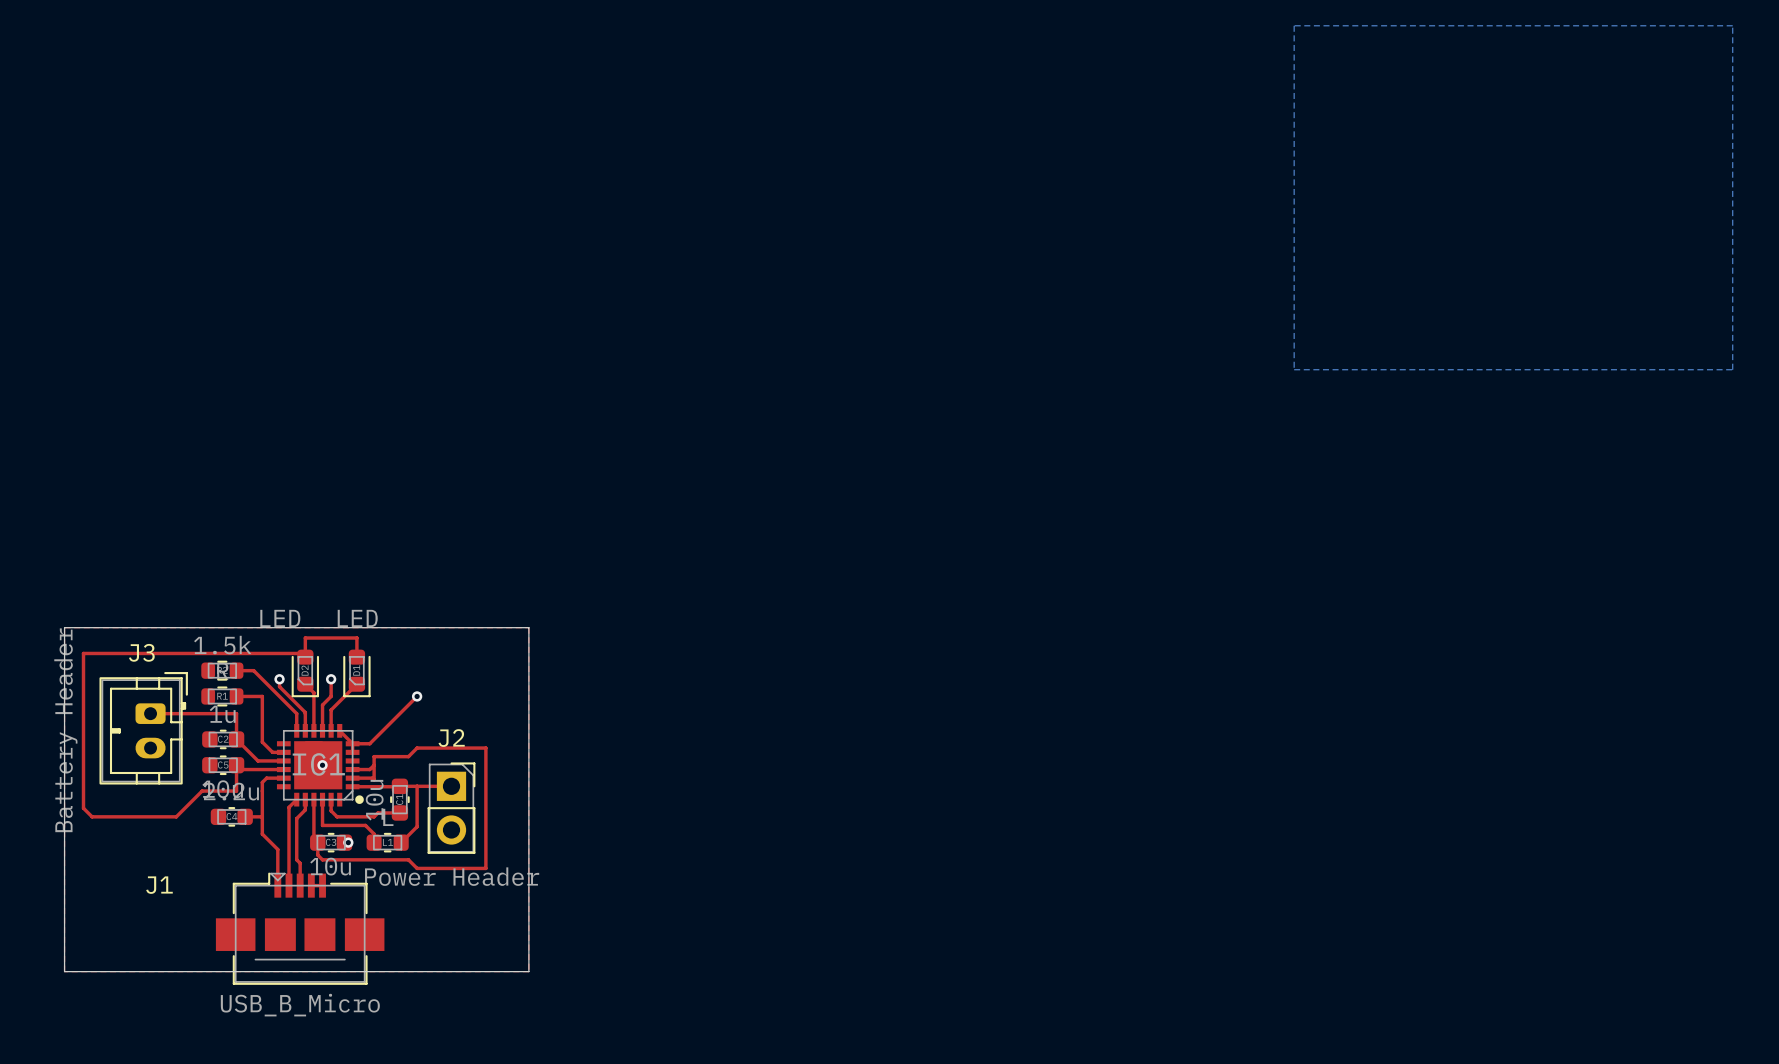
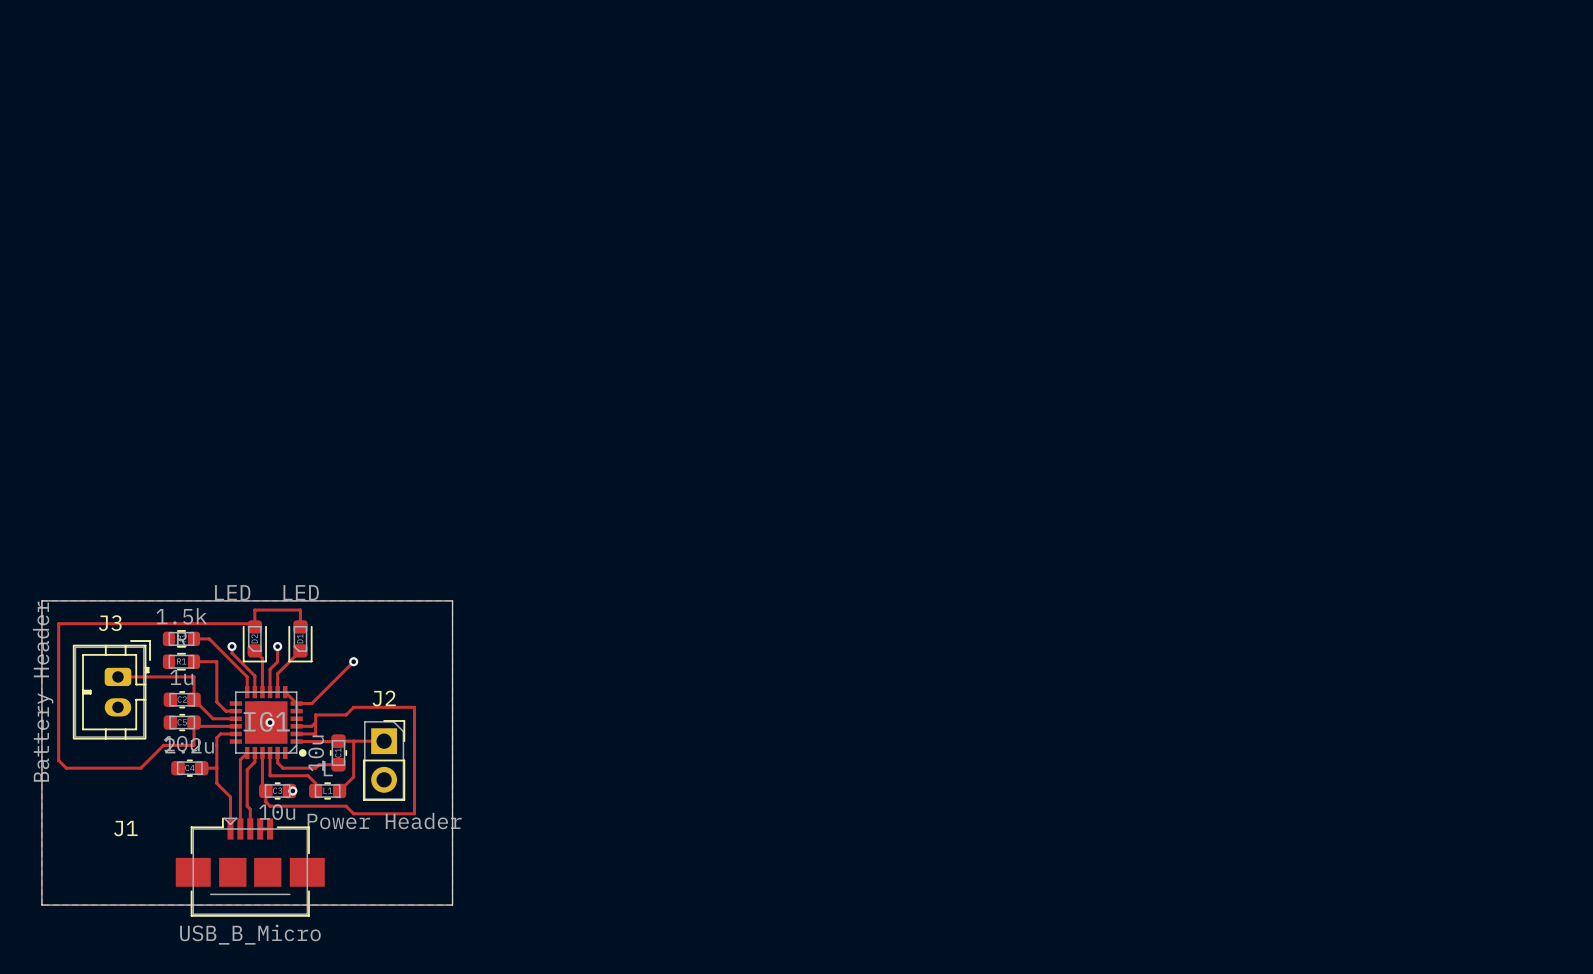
bottom zone outline: (1294, 25) (1294, 369) (1732, 369) (1732, 25) (1294, 25) -> none

